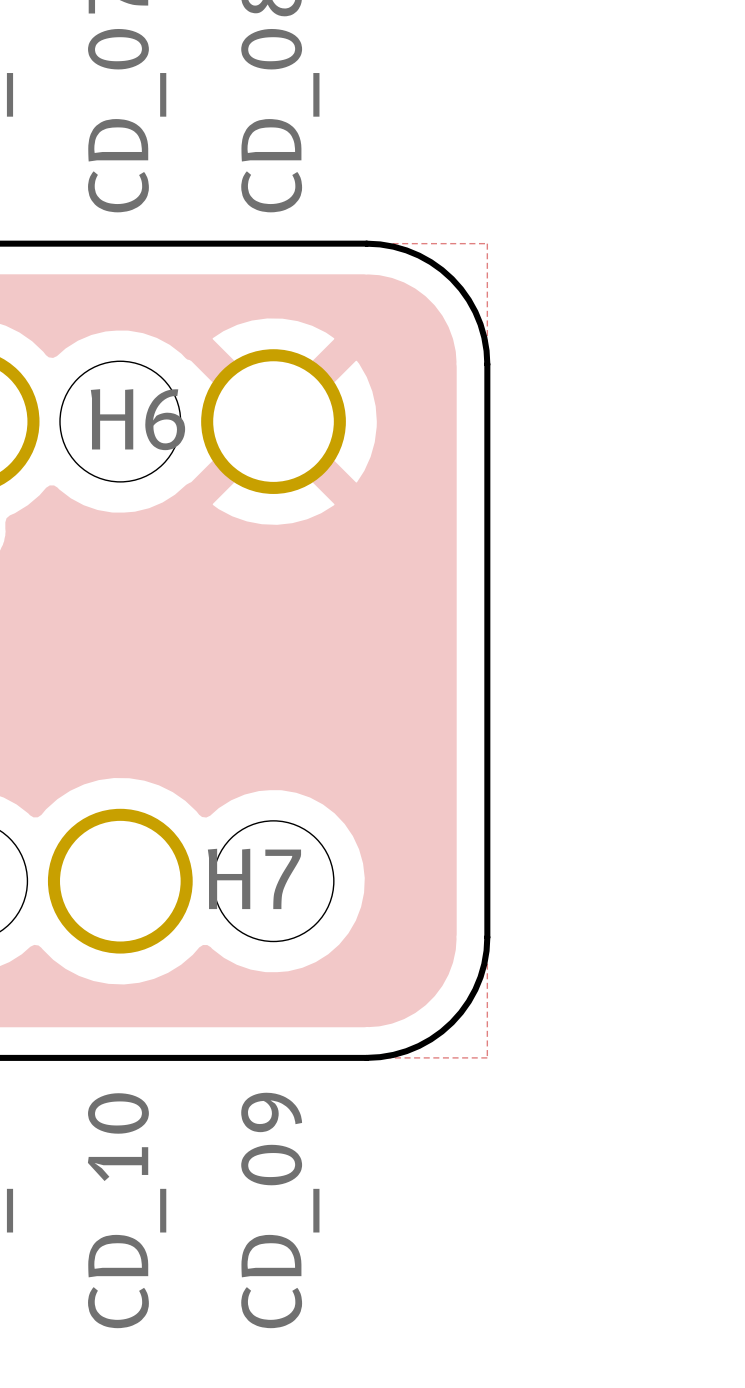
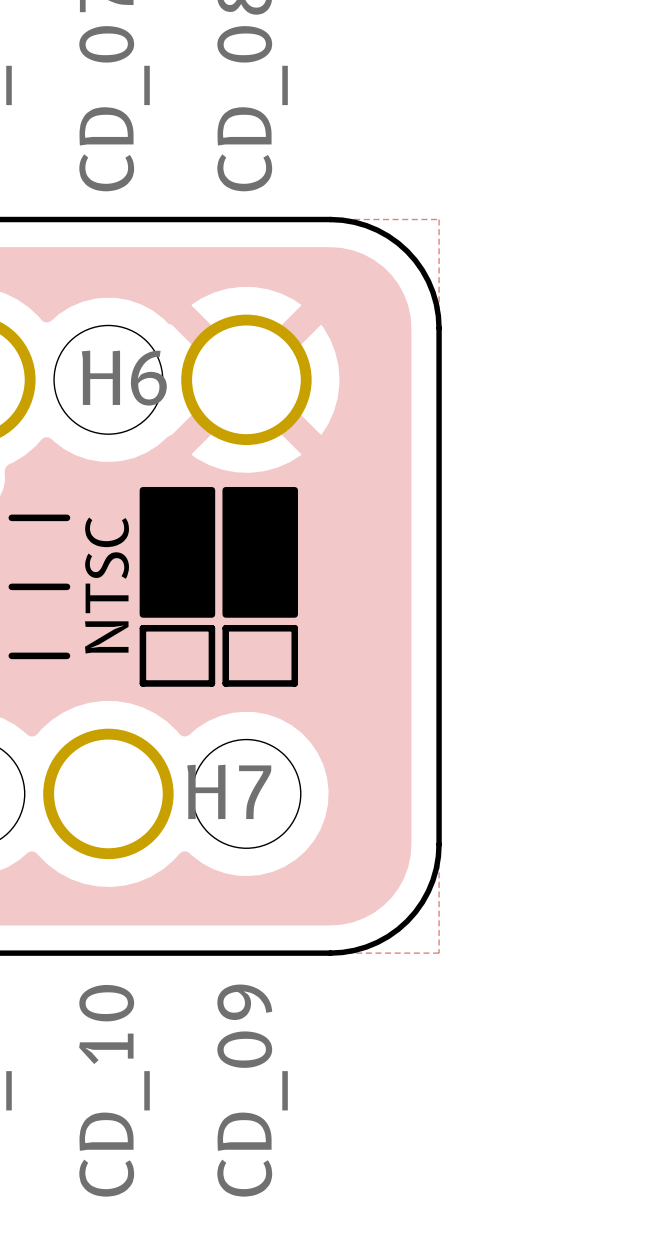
drawing: none -> [139, 486, 299, 618]
line: none -> (11, 517) (66, 517)
text: none -> NTSC (107, 585)
line: none -> (11, 586) (66, 586)
line: none -> (142, 628) (211, 628) (211, 683) (142, 683) (142, 628)
line: none -> (225, 628) (294, 628) (294, 683) (225, 683) (225, 628)
line: none -> (11, 655) (66, 655)

